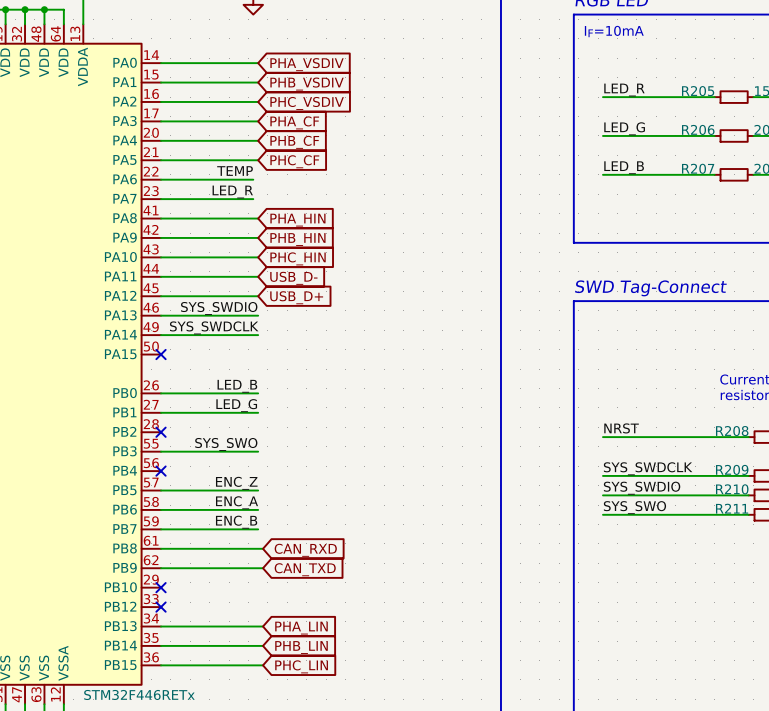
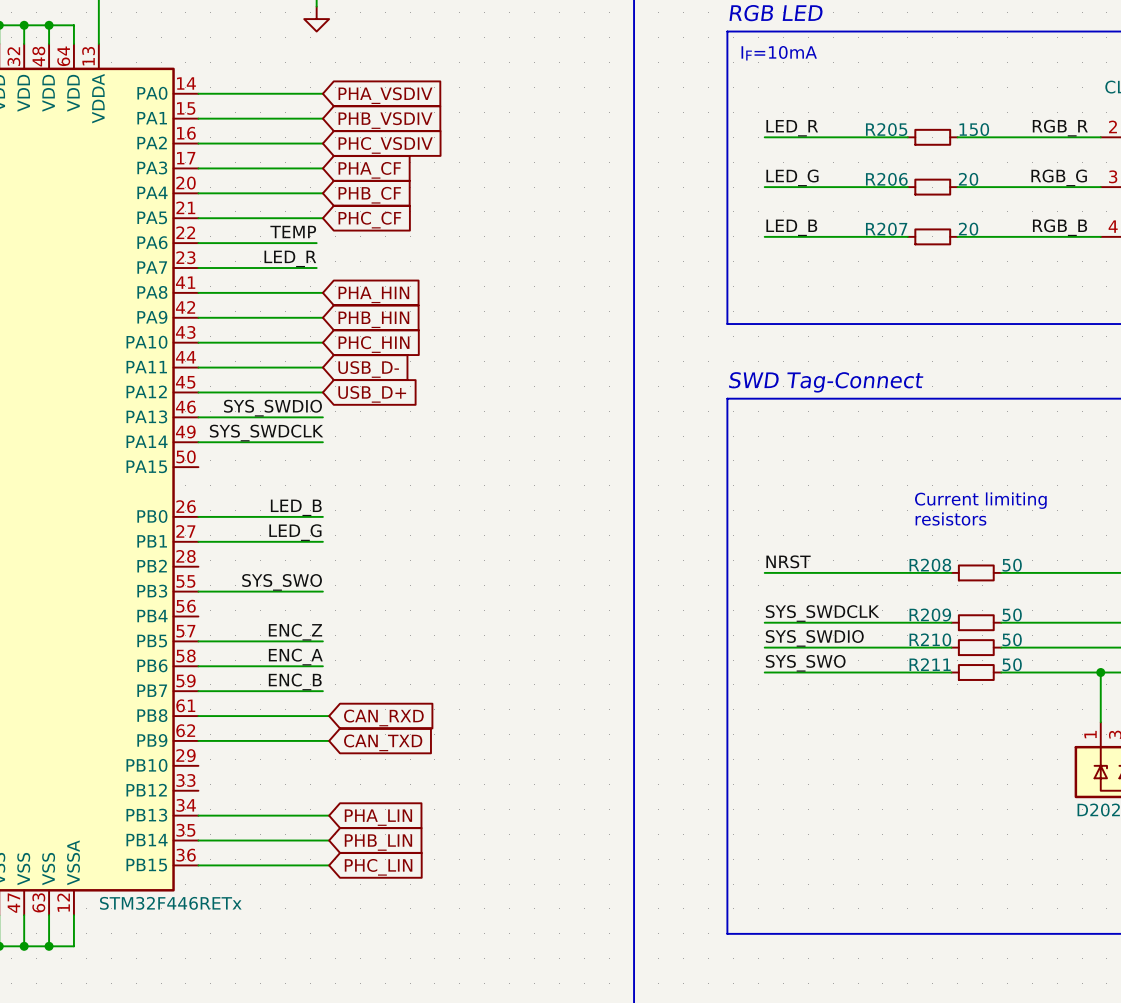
no-connect mark: (161, 354) -> none
no-connect mark: (161, 432) -> none
no-connect mark: (161, 471) -> none
no-connect mark: (161, 587) -> none
no-connect mark: (161, 607) -> none

